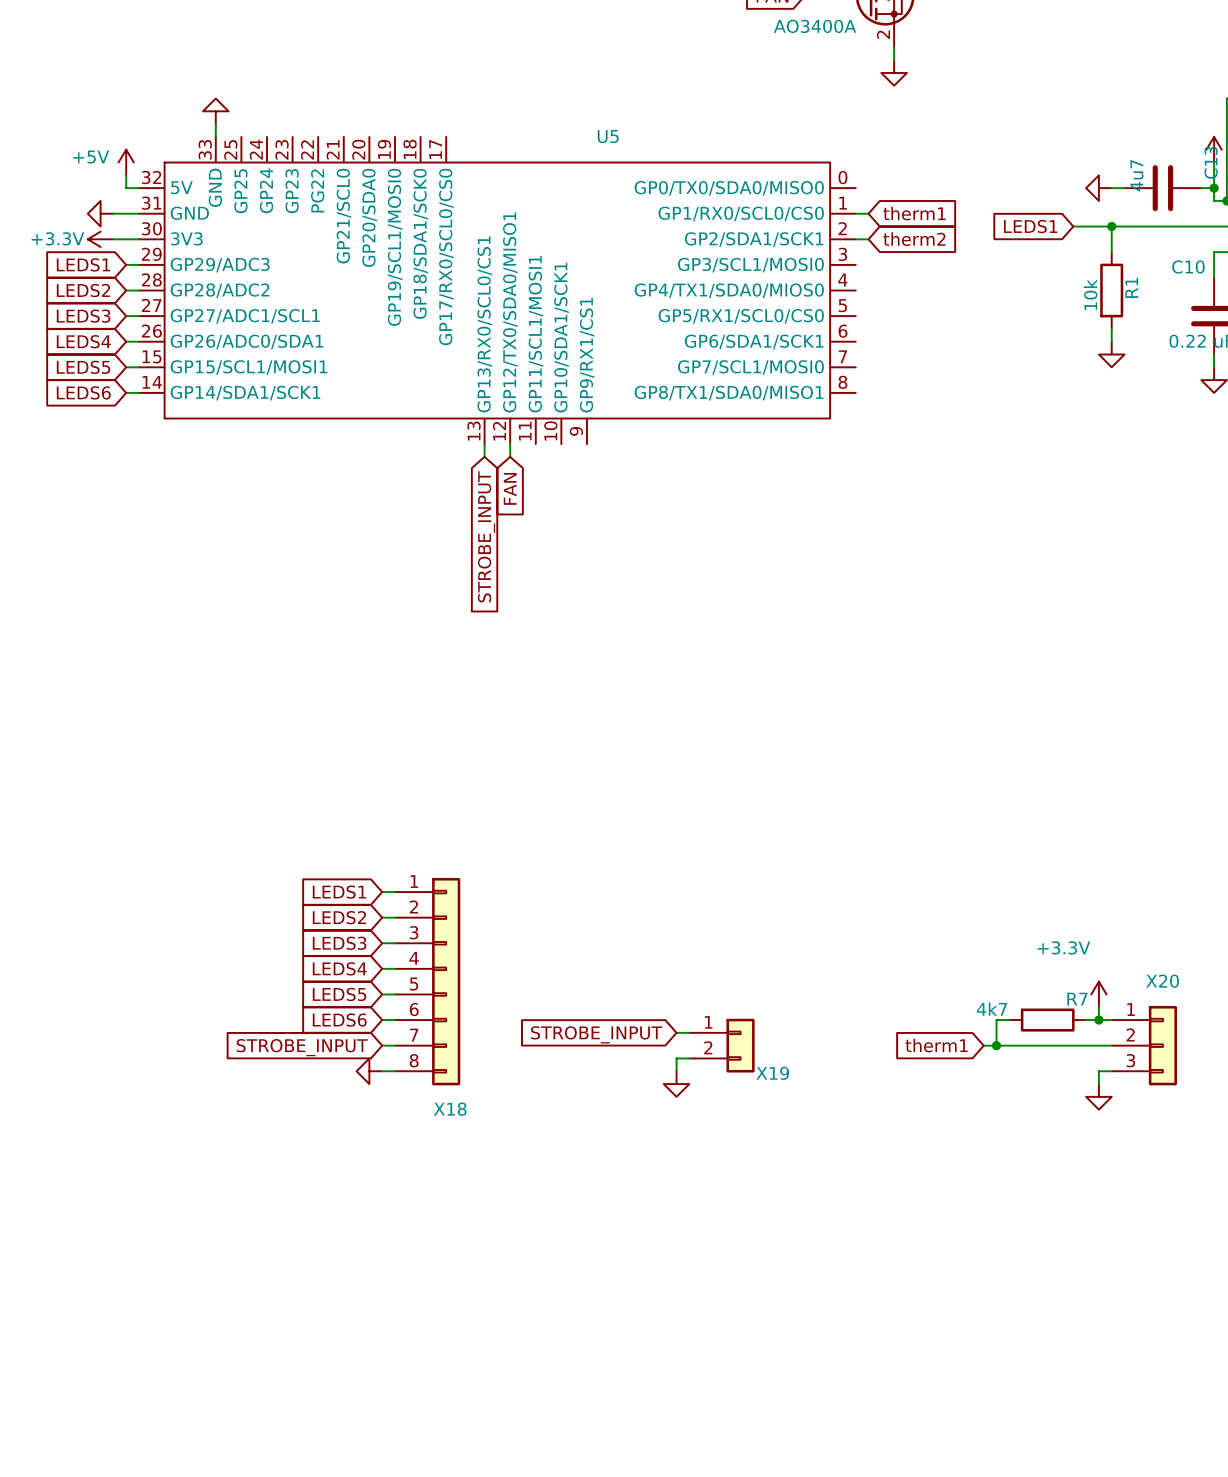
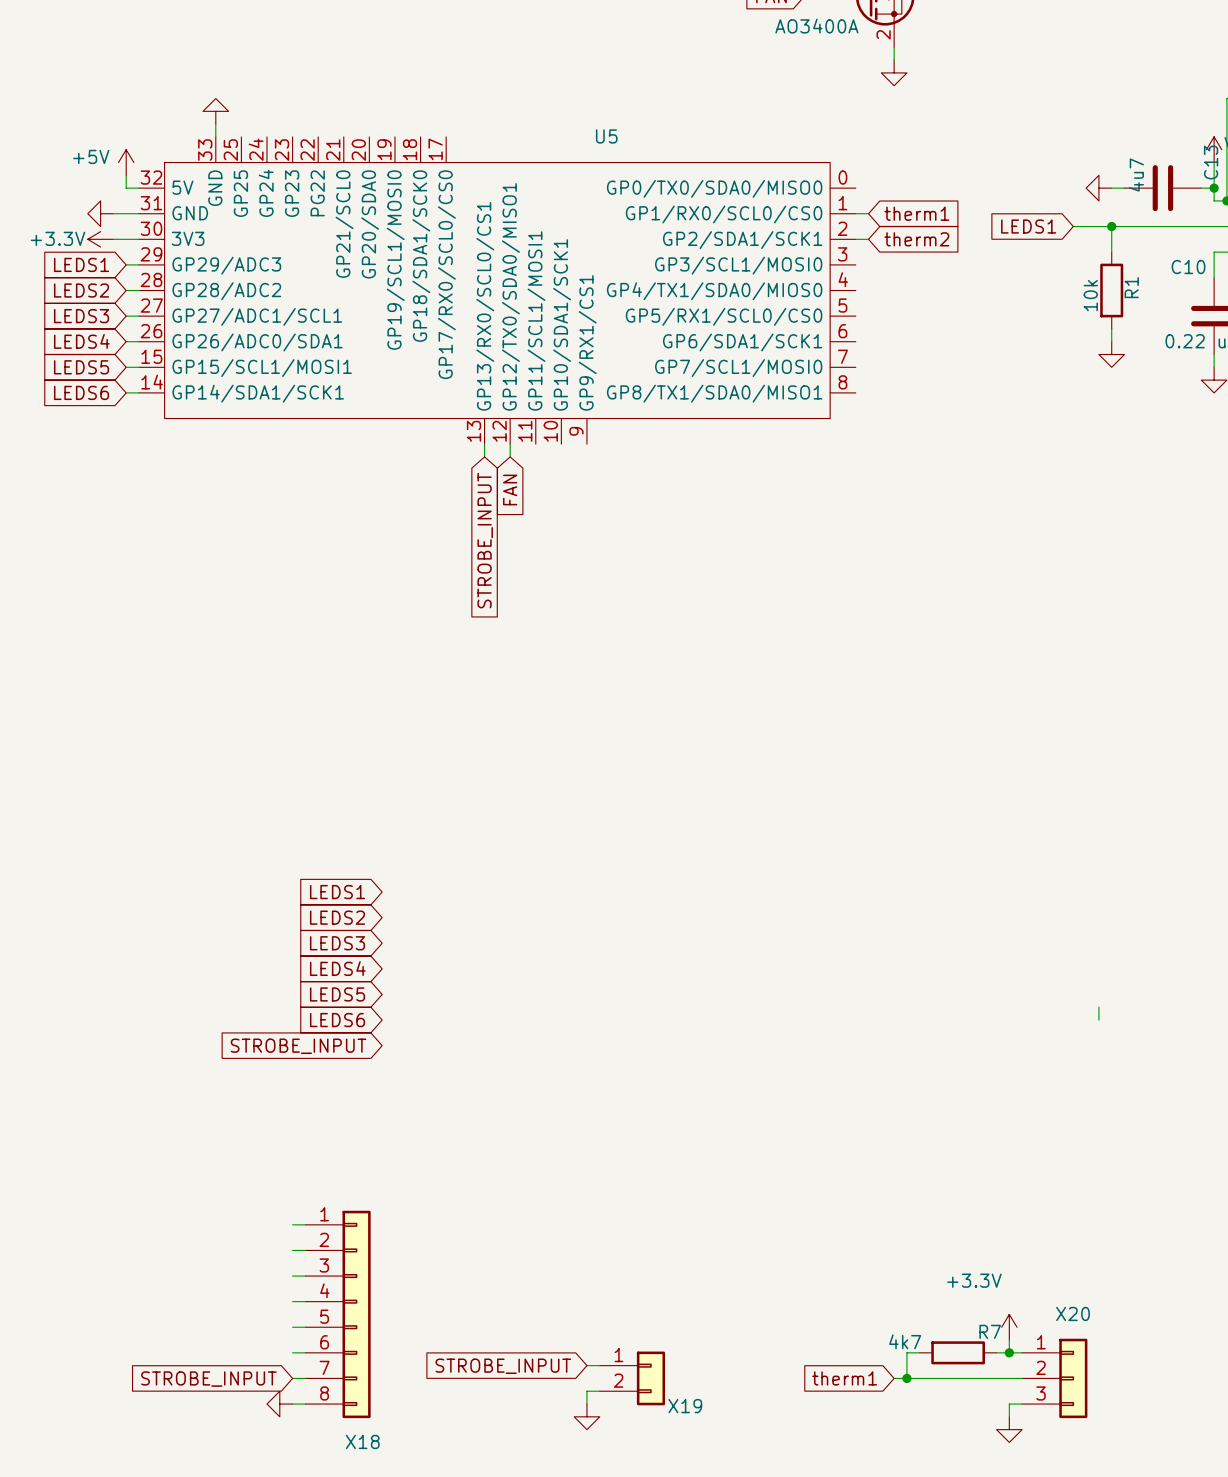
wire: (382, 892) (394, 892) -> none
wire: (382, 917) (394, 917) -> none
wire: (382, 943) (394, 943) -> none
wire: (382, 968) (394, 968) -> none
X18 position: (427, 981) -> (338, 1314)
wire: (382, 994) (394, 994) -> (292, 1224) (305, 1224)
power symbol: +3.3V (1098, 994) -> none
wire: (382, 1020) (394, 1020) -> (292, 1250) (305, 1250)
wire: (1009, 1020) (996, 1020) (996, 1045) -> none
R7 position: (1047, 1020) -> (958, 1352)
wire: (1086, 1020) (1111, 1020) -> none
junction: (1098, 1020) -> none
wire: (676, 1032) (689, 1032) -> none
global label: STROBE_INPUT (596, 1034) -> none
wire: (382, 1045) (394, 1045) -> (292, 1276) (305, 1276)
X19 position: (721, 1045) -> (632, 1378)
global label: therm1 (936, 1045) -> none
wire: (983, 1045) (1111, 1045) -> none
junction: (996, 1045) -> none
X20 position: (1144, 1045) -> (1054, 1378)
wire: (689, 1058) (676, 1058) (676, 1071) -> none
power symbol: (369, 1071) -> none
wire: (382, 1071) (394, 1071) -> (292, 1301) (305, 1301)
wire: (1111, 1071) (1098, 1071) (1098, 1084) -> none
power symbol: (676, 1084) -> none
power symbol: (1098, 1096) -> none
wire: none -> (292, 1327) (305, 1327)
power symbol: none -> +3.3V (1009, 1327)
wire: none -> (1009, 1340) (1009, 1352)
wire: none -> (292, 1352) (305, 1352)
wire: none -> (919, 1352) (906, 1352) (906, 1378)
wire: none -> (996, 1352) (1022, 1352)
junction: none -> (1009, 1352)
wire: none -> (586, 1365) (599, 1365)
global label: none -> STROBE_INPUT (503, 1366)
wire: none -> (292, 1378) (305, 1378)
global label: none -> therm1 (844, 1378)
wire: none -> (894, 1378) (1022, 1378)
junction: none -> (906, 1378)
global label: none -> STROBE_INPUT (208, 1379)
wire: none -> (599, 1391) (586, 1391) (586, 1404)
power symbol: none -> (279, 1404)
wire: none -> (292, 1404) (305, 1404)
wire: none -> (1022, 1404) (1009, 1404) (1009, 1416)
power symbol: none -> (586, 1416)
power symbol: none -> (1009, 1429)

